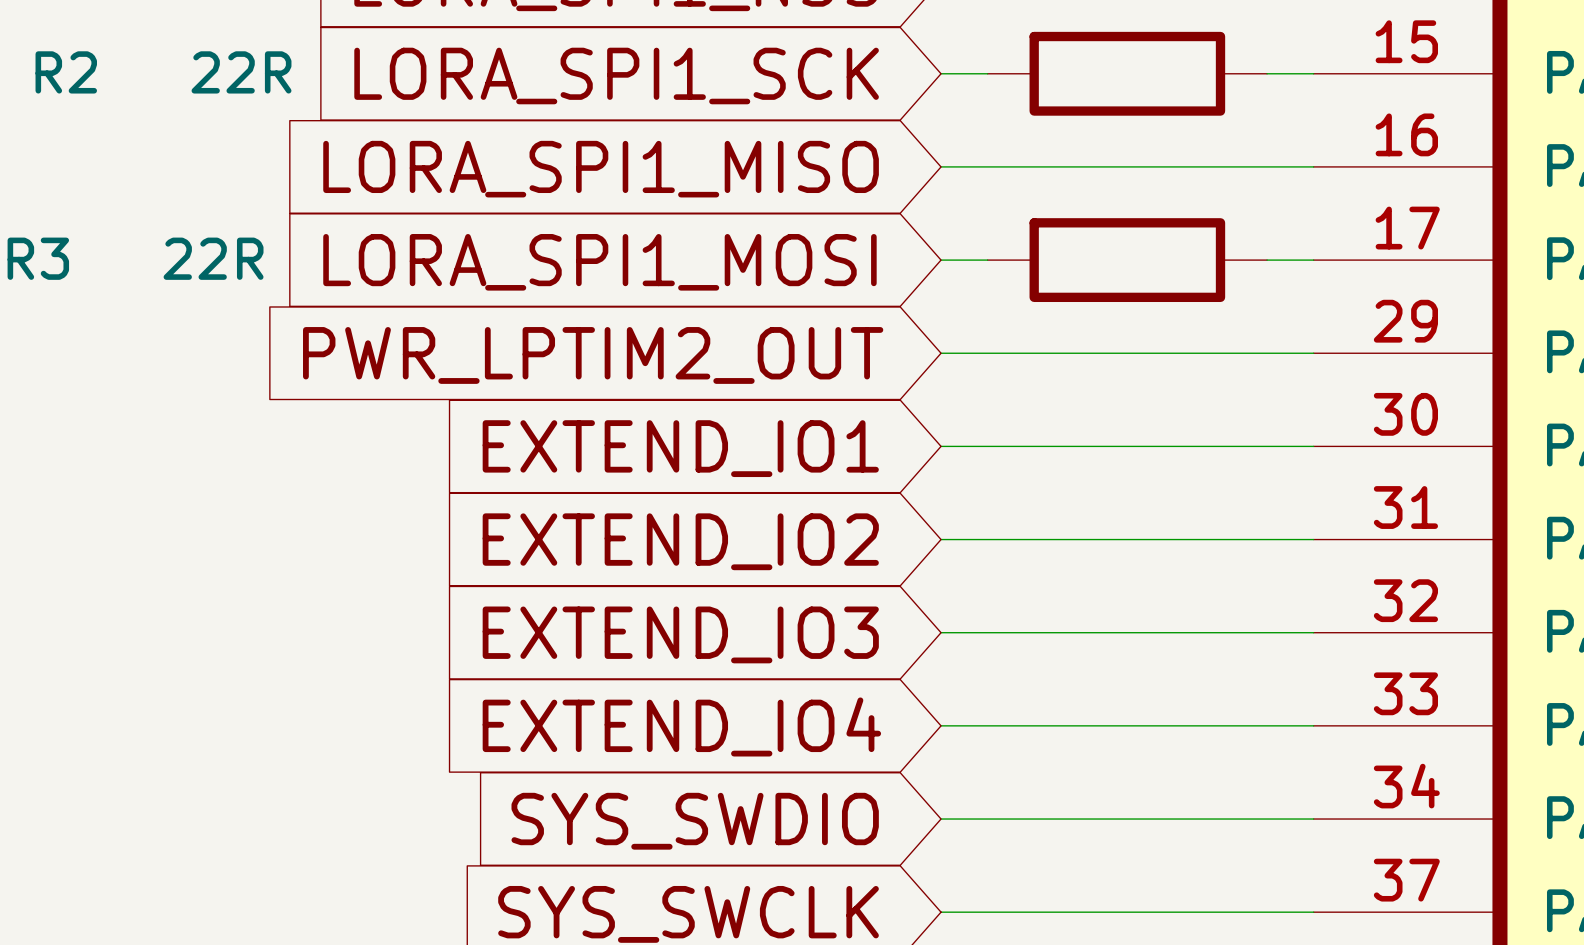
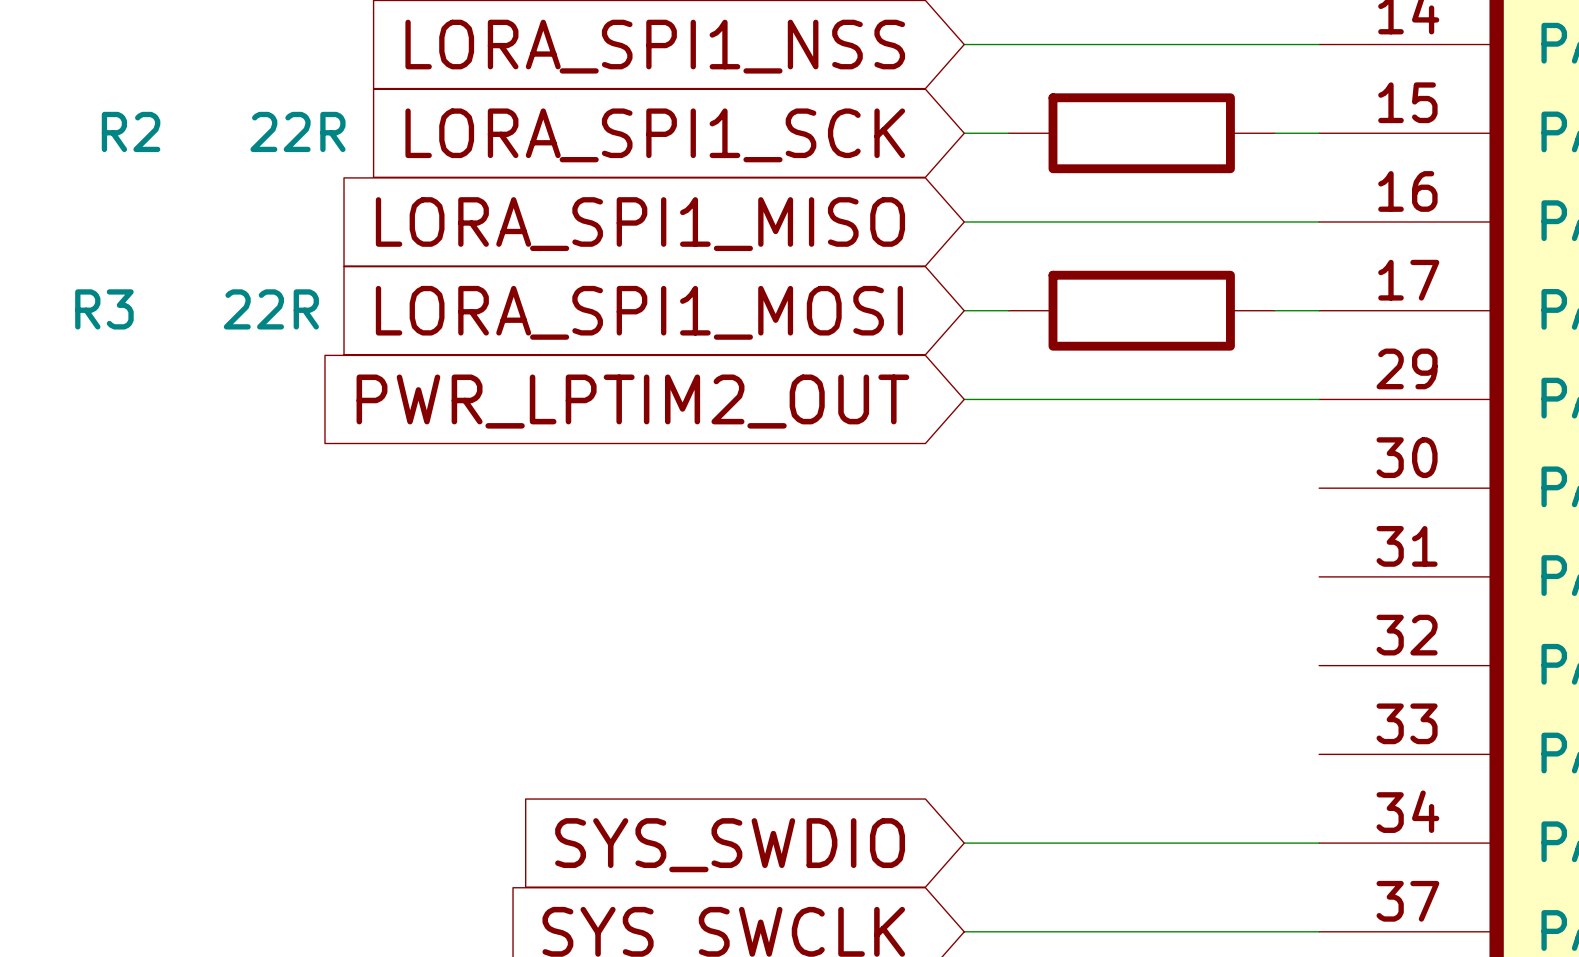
wire: (941, 446) (1313, 446) -> none
global label: EXTEND_IO1 (680, 448) -> none
wire: (941, 539) (1313, 539) -> none
global label: EXTEND_IO2 (680, 541) -> none
wire: (941, 632) (1313, 632) -> none
global label: EXTEND_IO3 (680, 634) -> none
wire: (941, 725) (1313, 725) -> none
global label: EXTEND_IO4 (681, 726) -> none

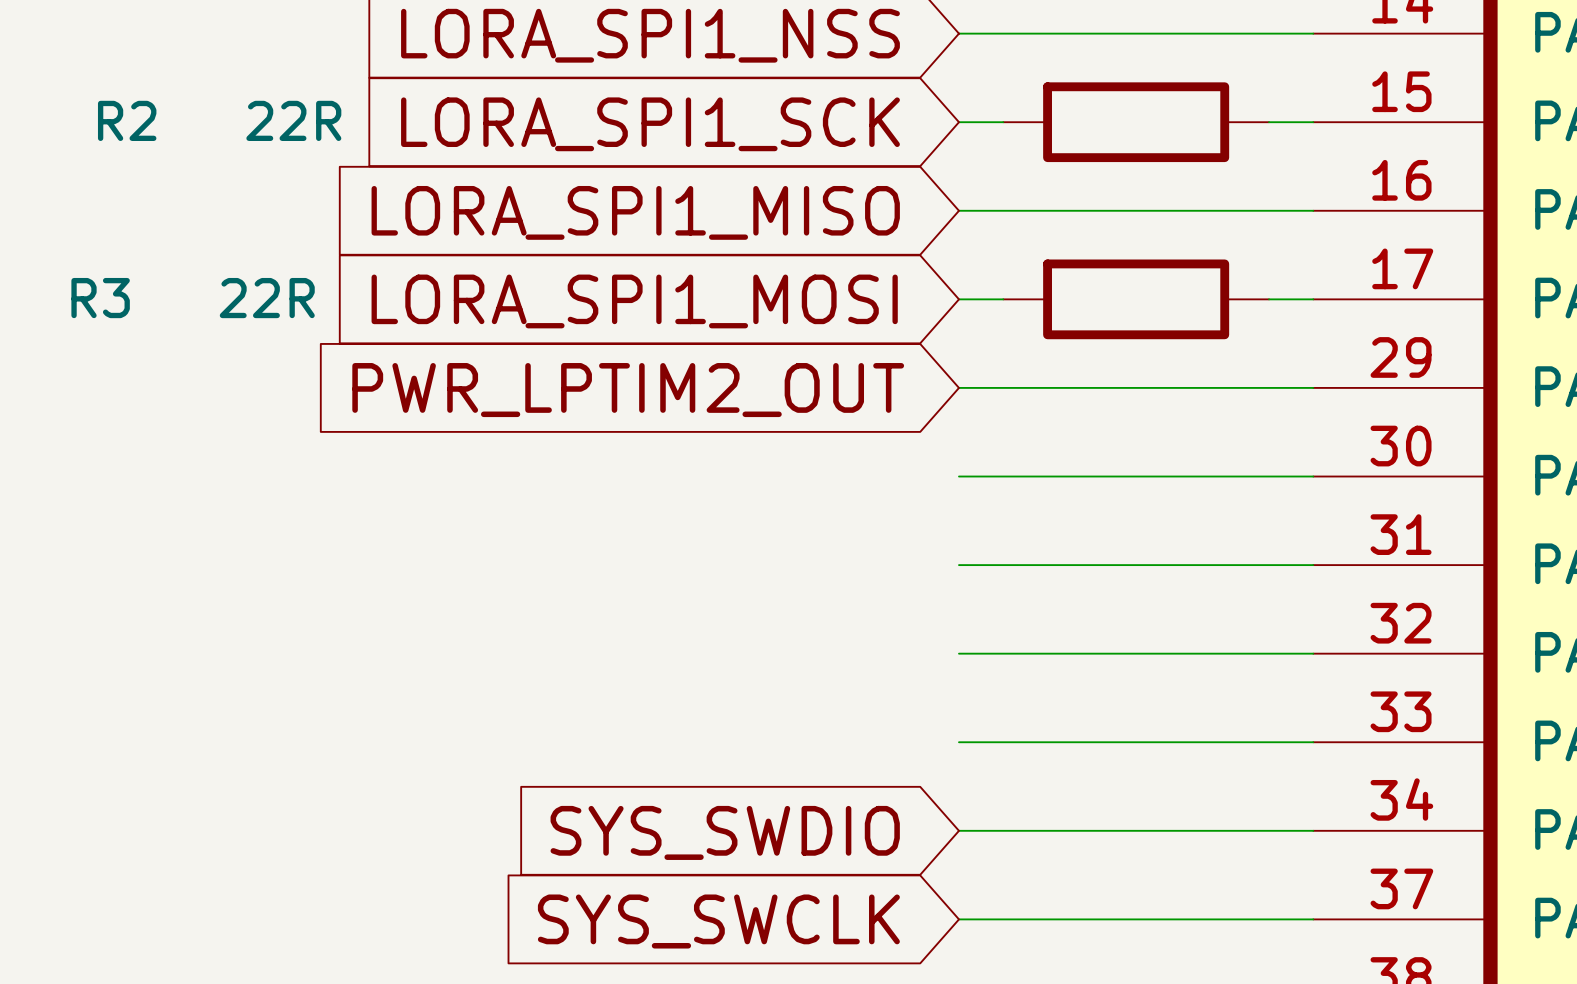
wire: none -> (958, 476) (1313, 476)
wire: none -> (958, 565) (1313, 565)
wire: none -> (958, 653) (1313, 653)
wire: none -> (958, 742) (1313, 742)

